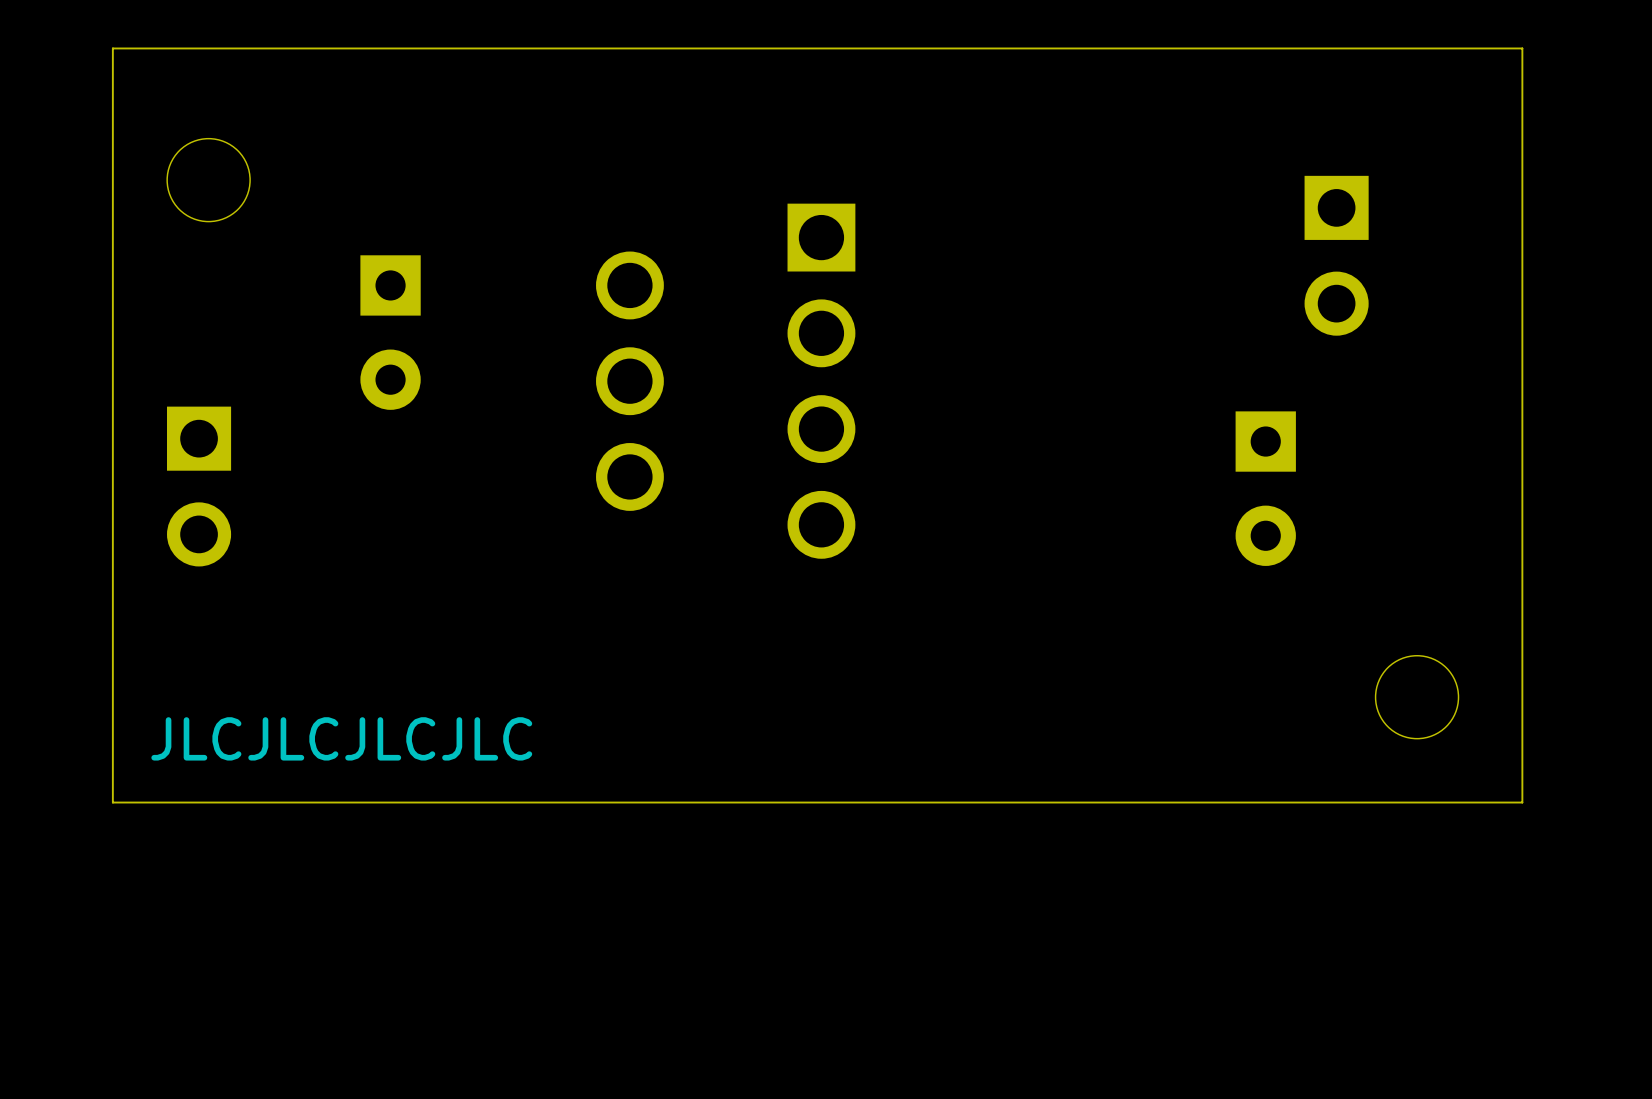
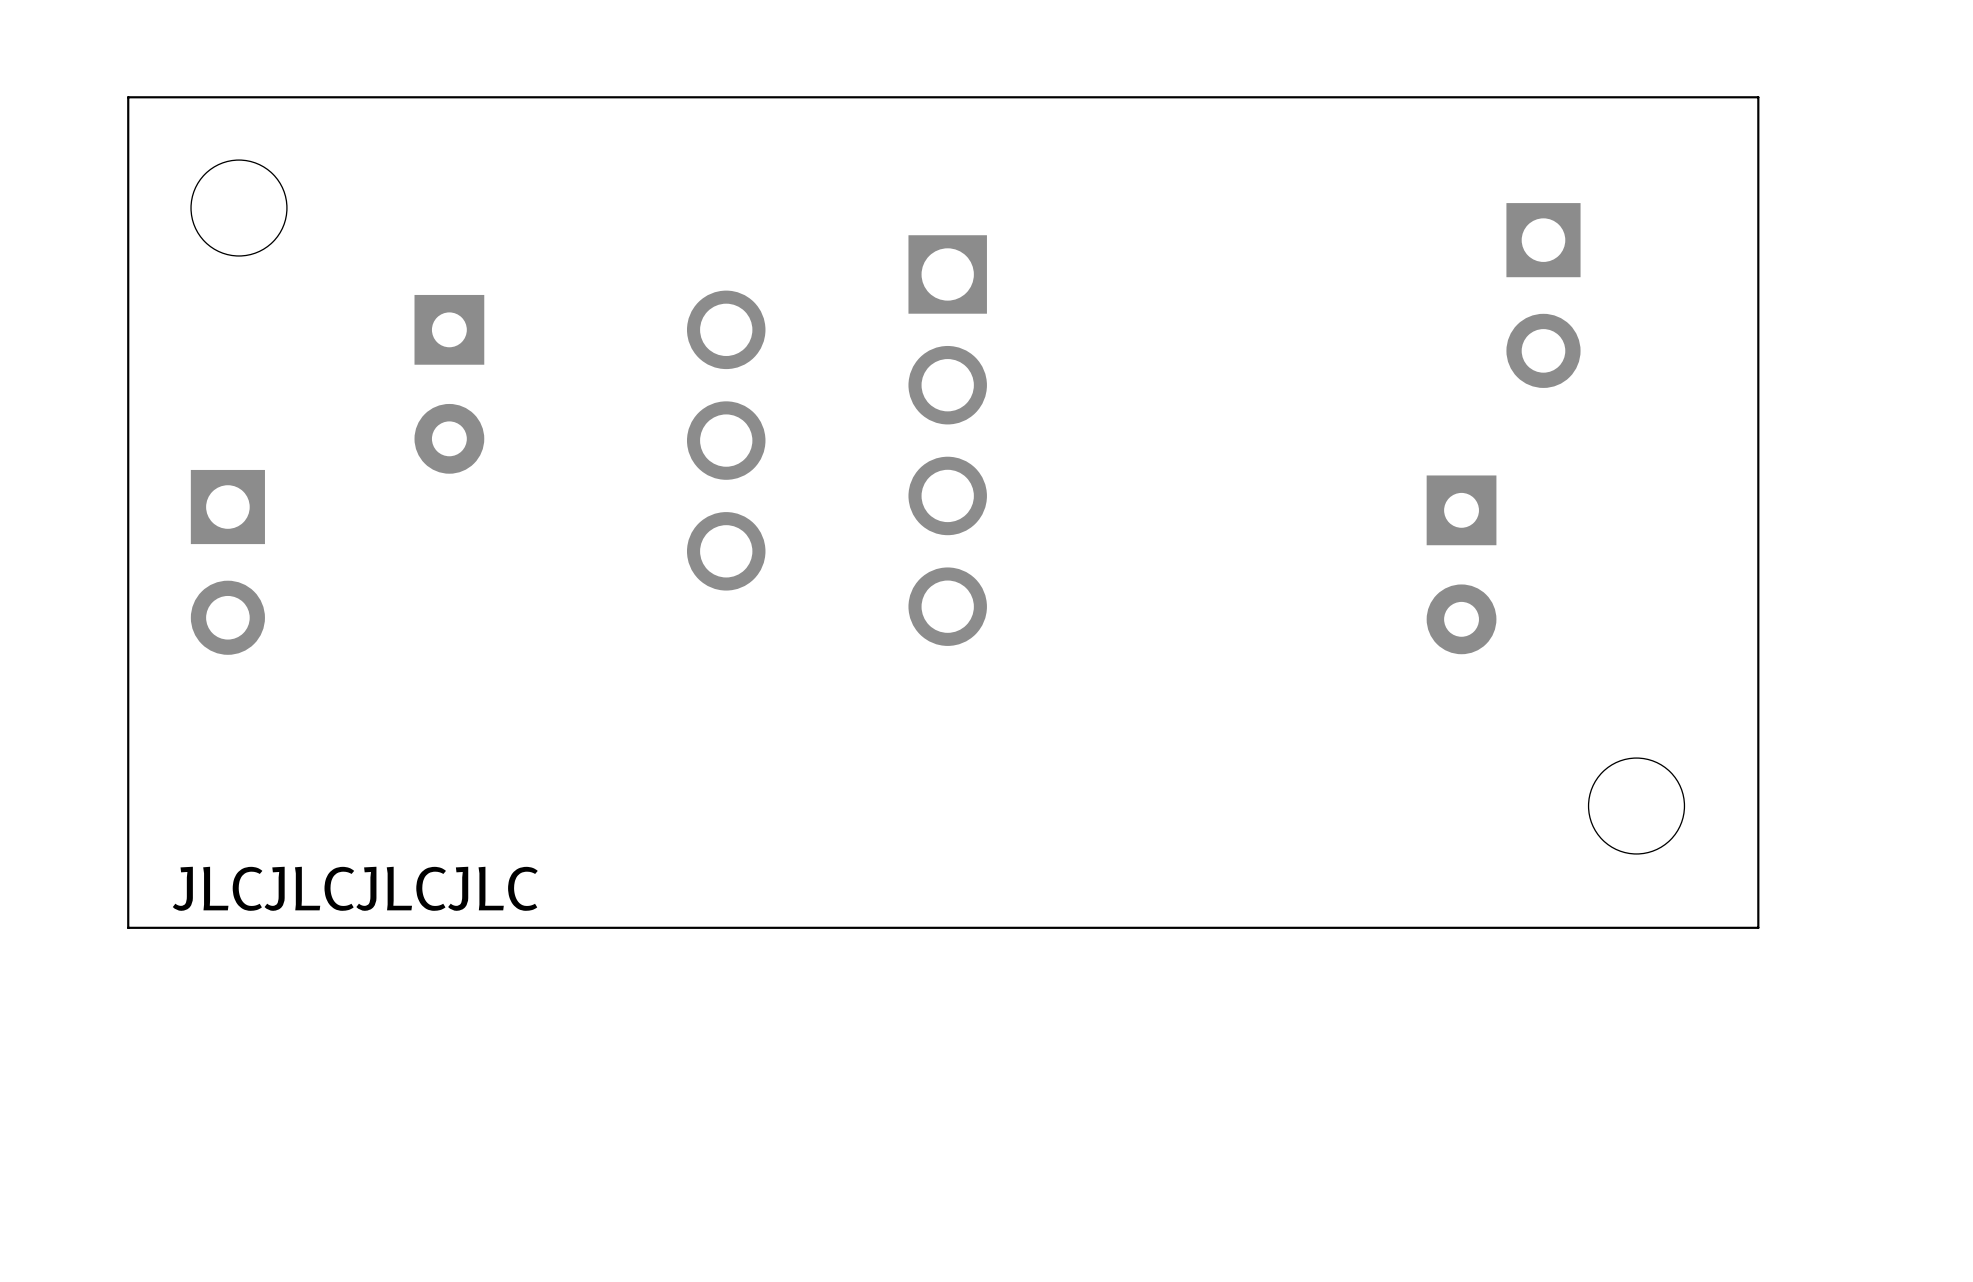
board edge: (1522, 84) (1522, 48) (112, 48) (112, 84) -> (1758, 97) (128, 97)
text position: JLCJLCJLCJLC (341, 738) -> JLCJLCJLCJLC (355, 888)

